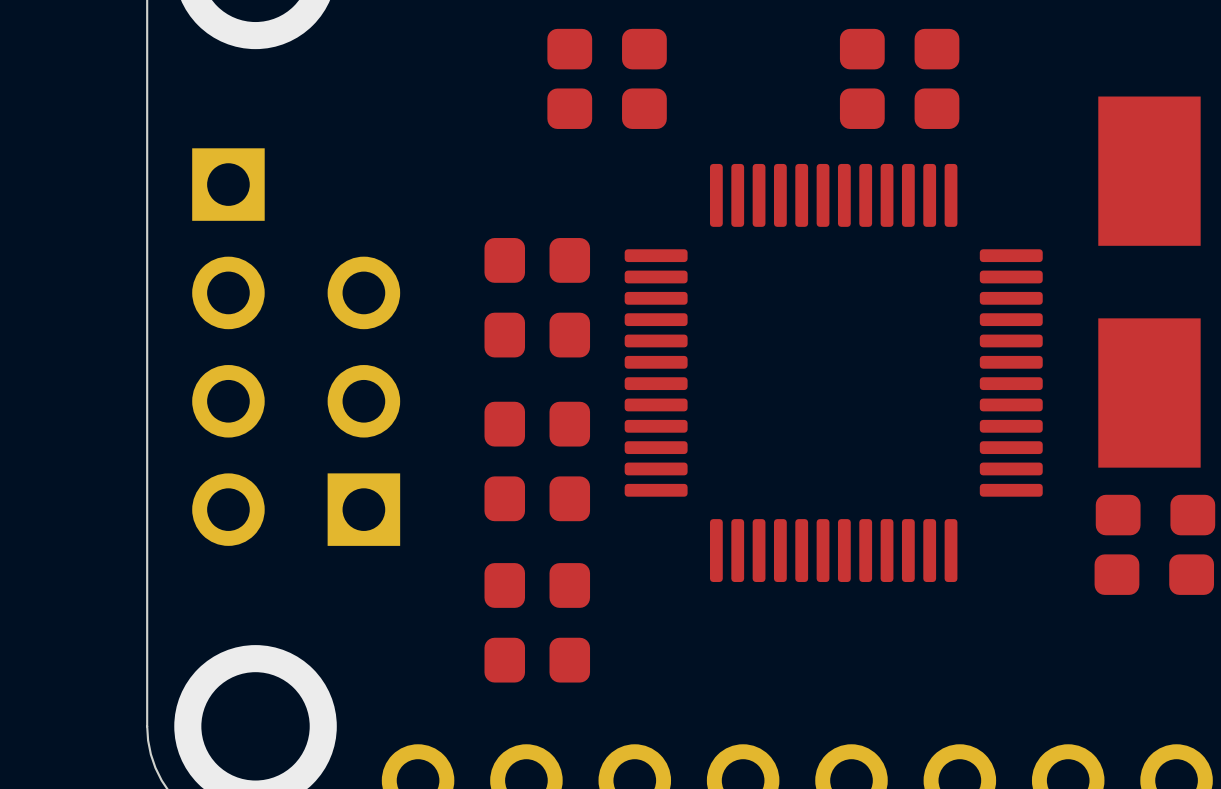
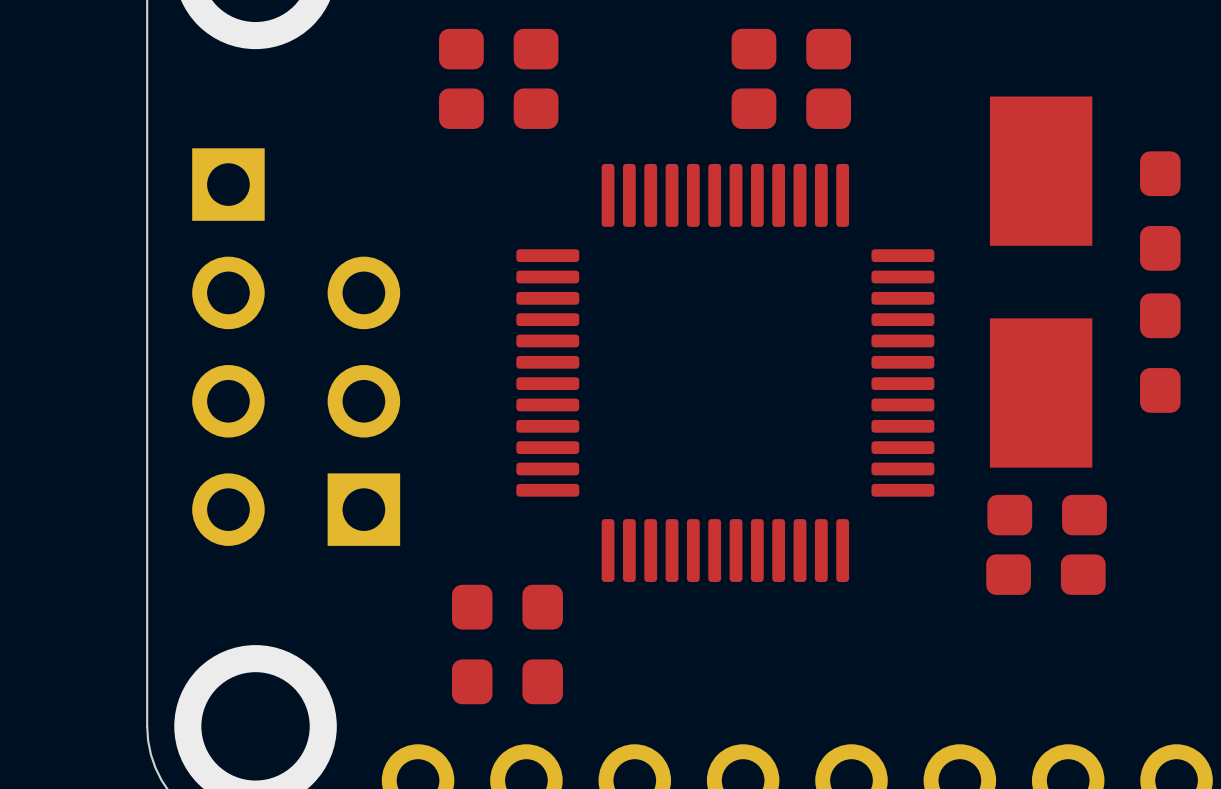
part: none -> (498, 49)
part: (607, 49) -> none
part: none -> (791, 49)
part: (899, 49) -> none
part: none -> (498, 108)
part: (607, 108) -> none
part: none -> (791, 108)
part: (899, 108) -> none
part: none -> (1160, 211)
part position: (1149, 282) -> (1041, 282)
part: (504, 297) -> none
part: (569, 297) -> none
part: none -> (1160, 353)
part position: (833, 372) -> (725, 372)
part: (504, 461) -> none
part: (569, 461) -> none
part: none -> (1047, 515)
part: (1155, 515) -> none
part: none -> (1045, 574)
part: (1154, 574) -> none
part: (504, 622) -> none
part: (569, 622) -> none
part: none -> (472, 644)
part: none -> (542, 644)

